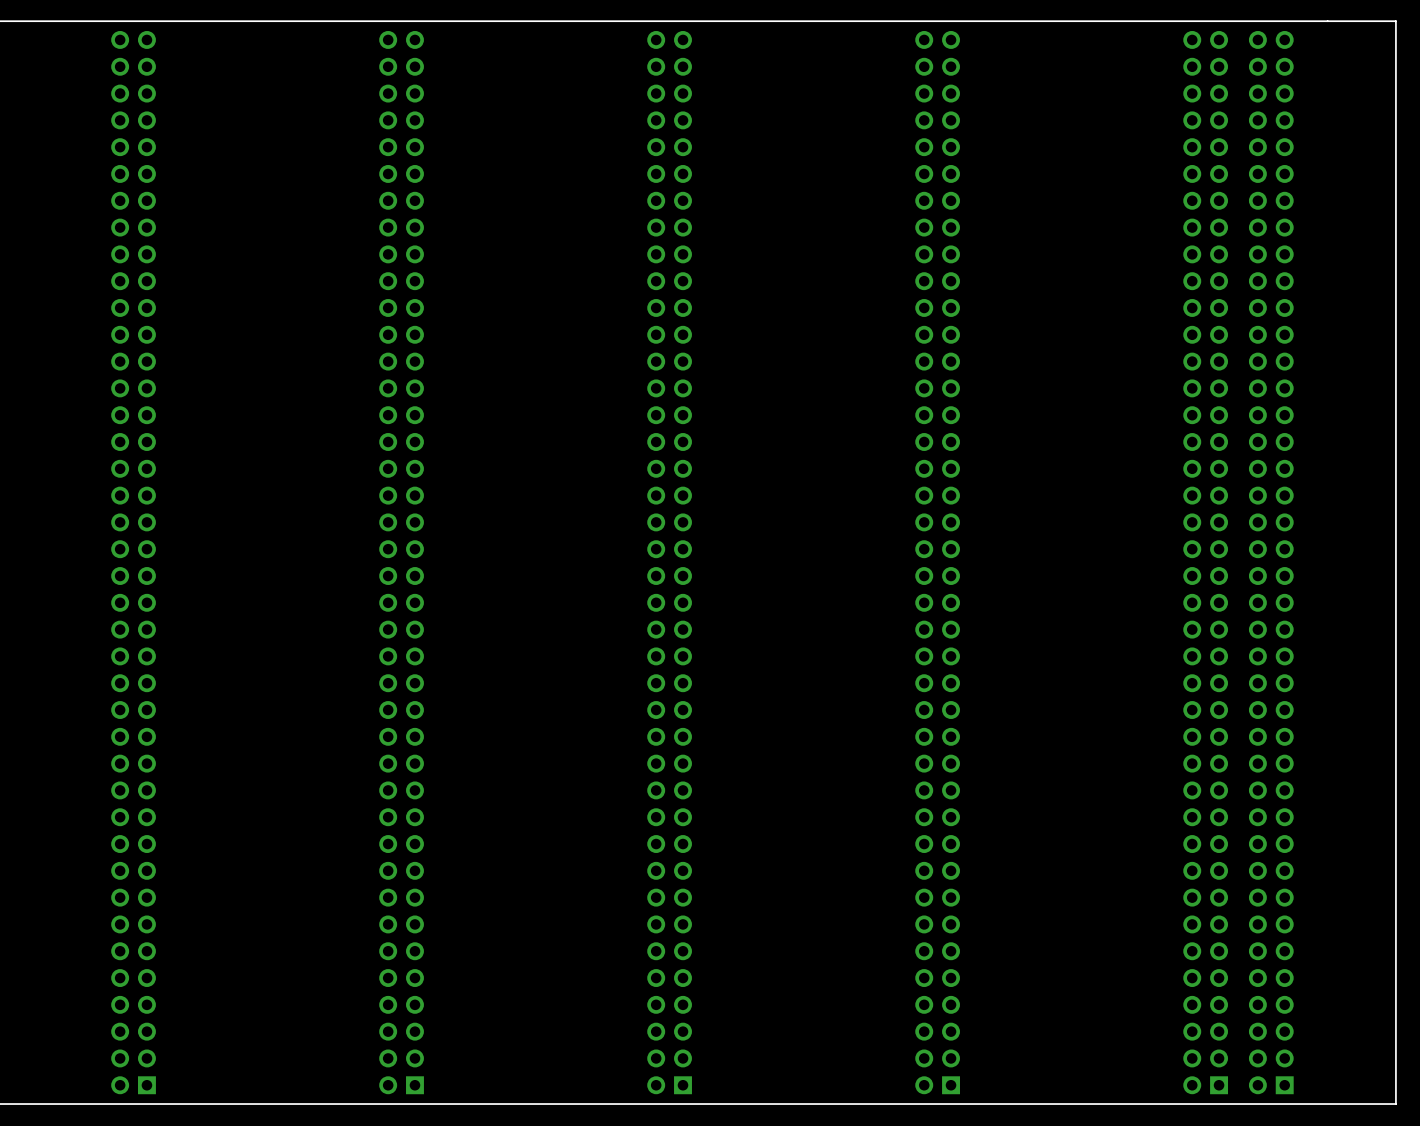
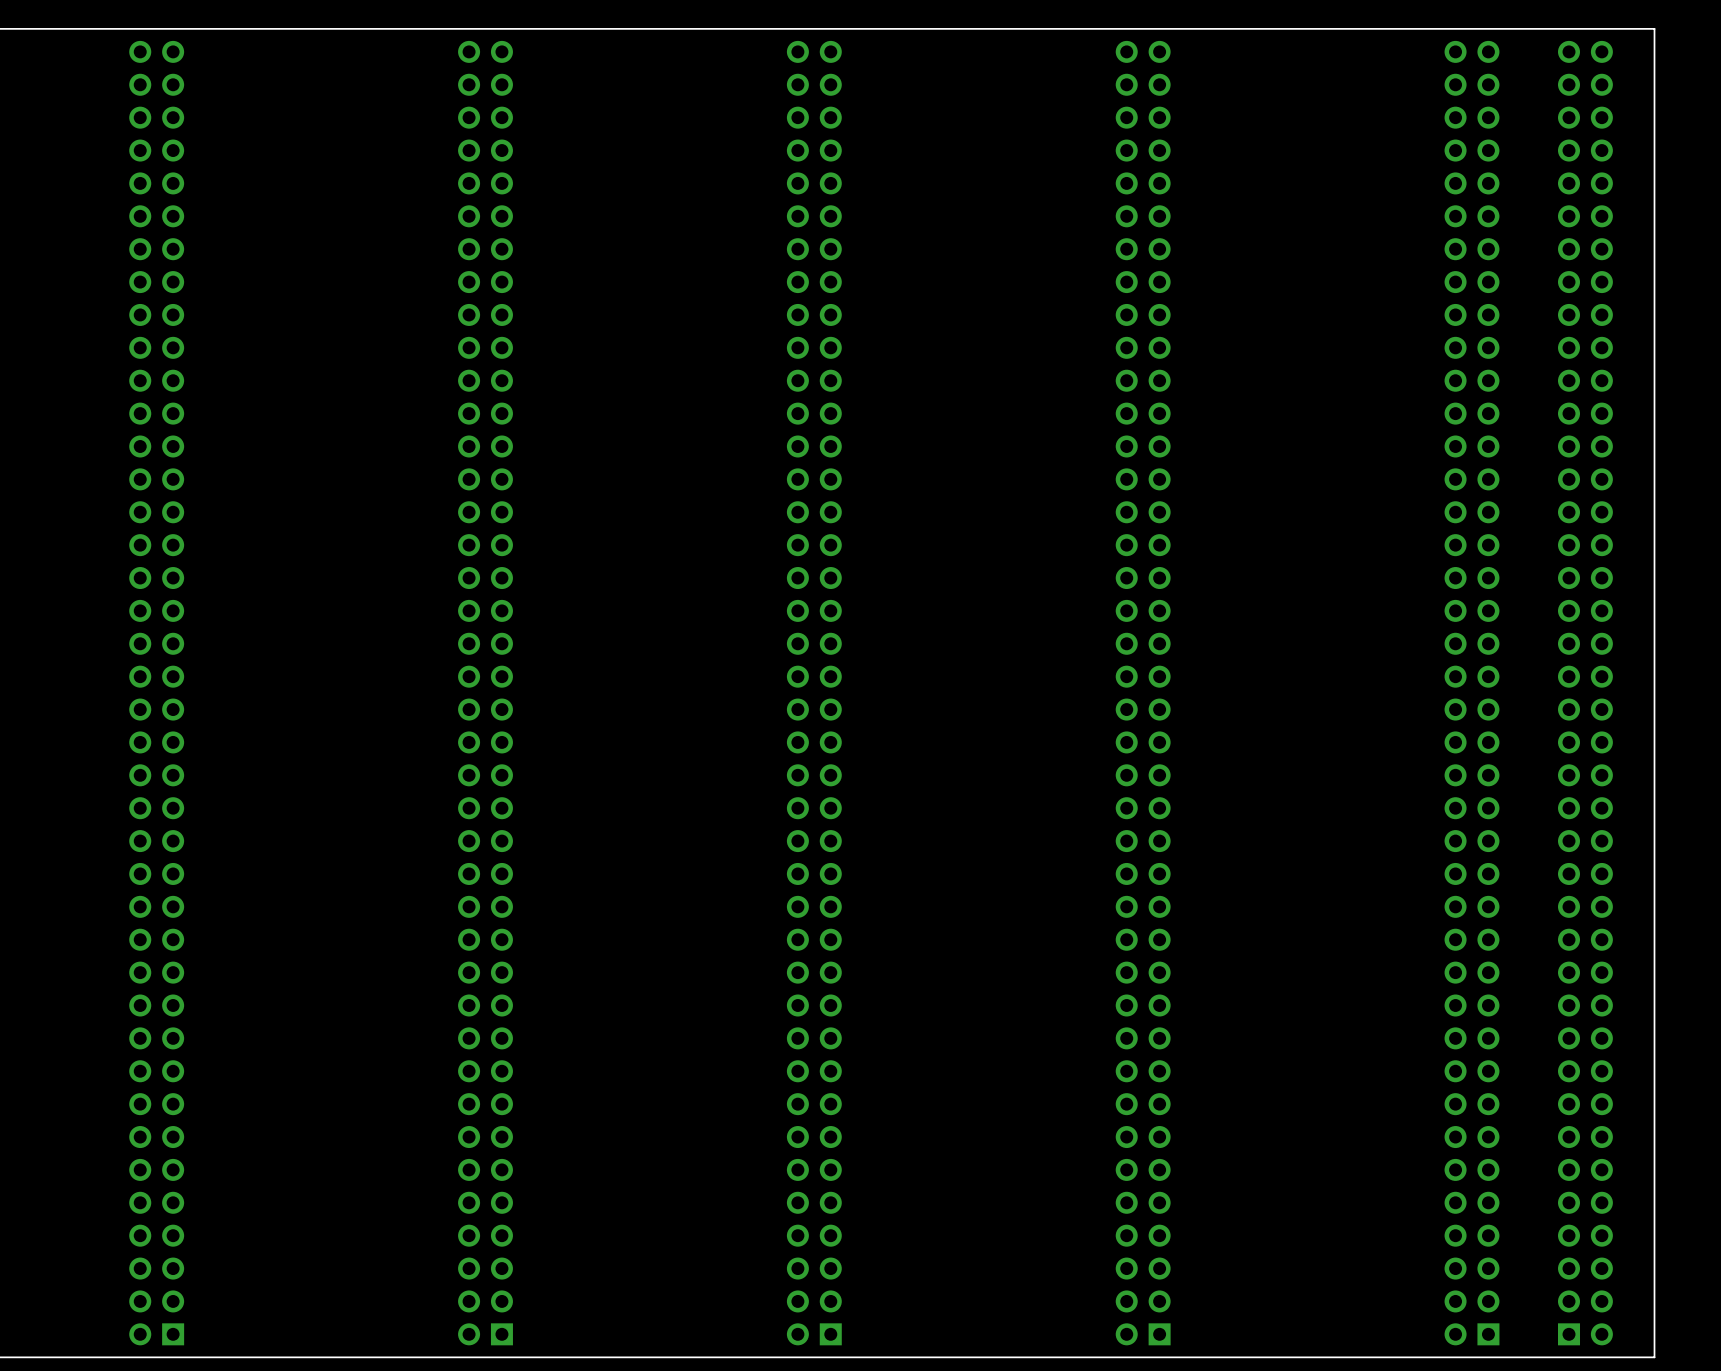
board edge: (1354, 21) (1395, 21) (1395, 1104) (1354, 1104) -> (1654, 28) (1654, 1357)
part: (1271, 562) -> none
part: none -> (1585, 693)

